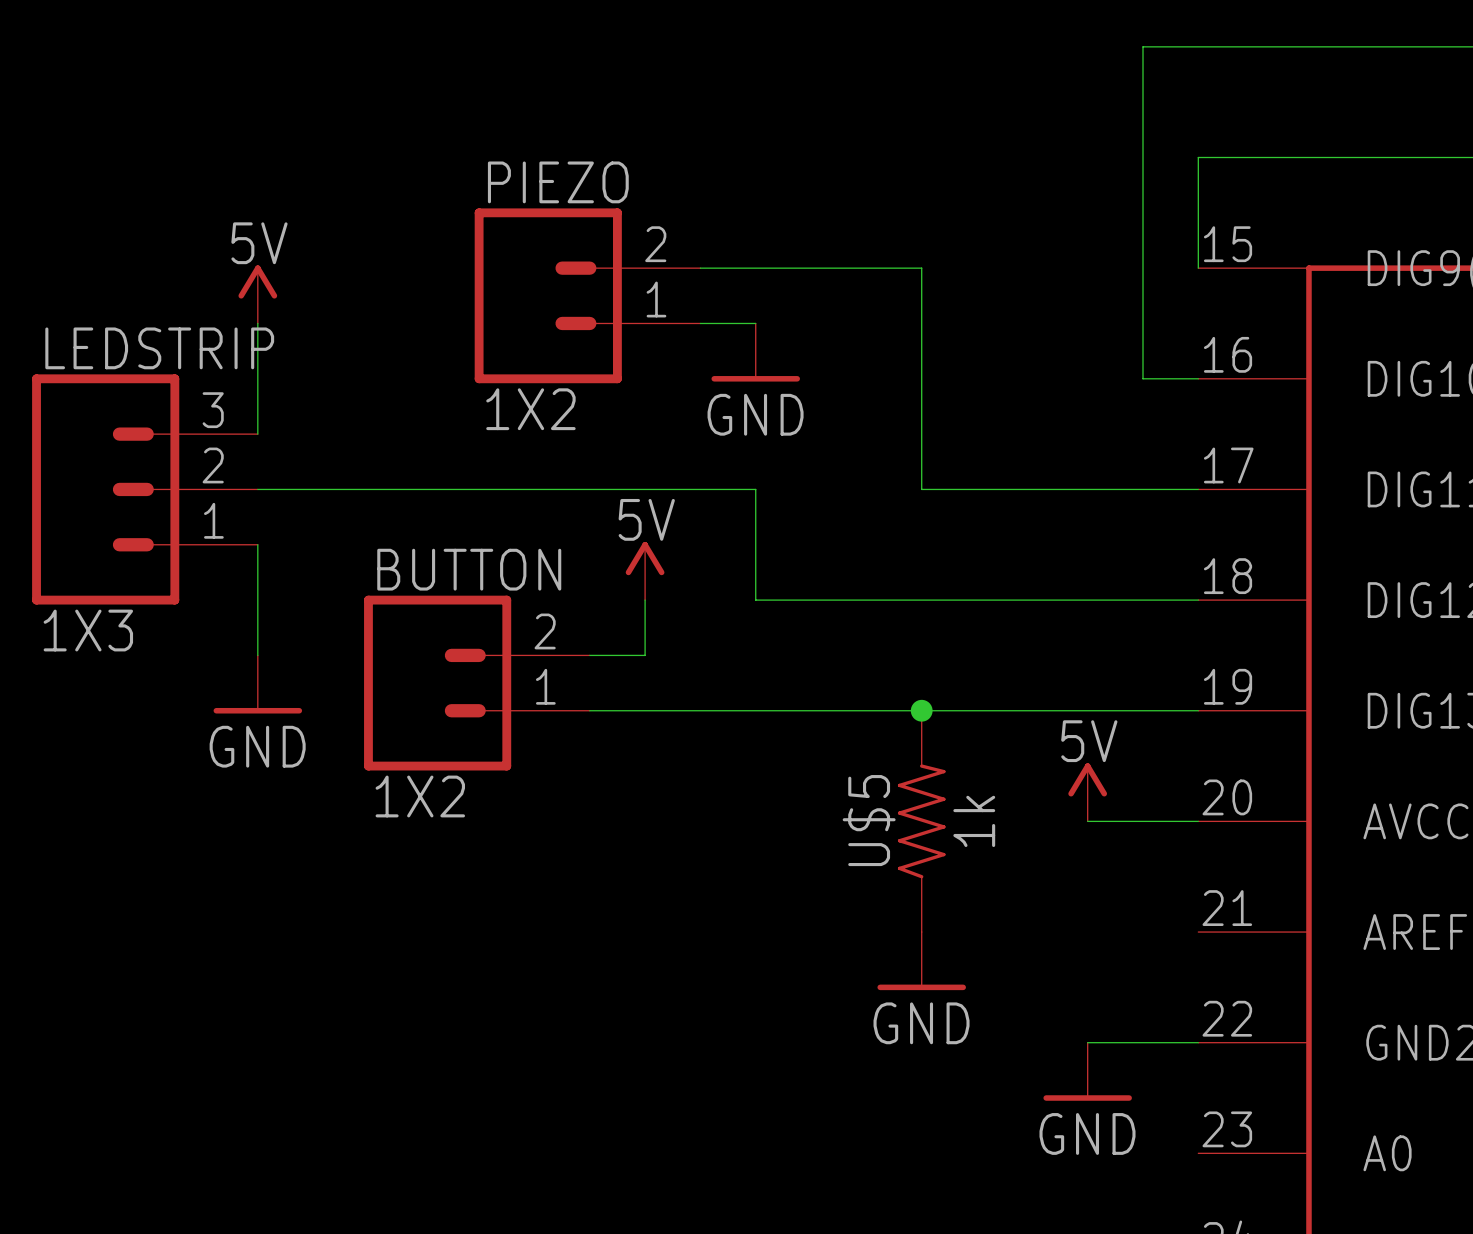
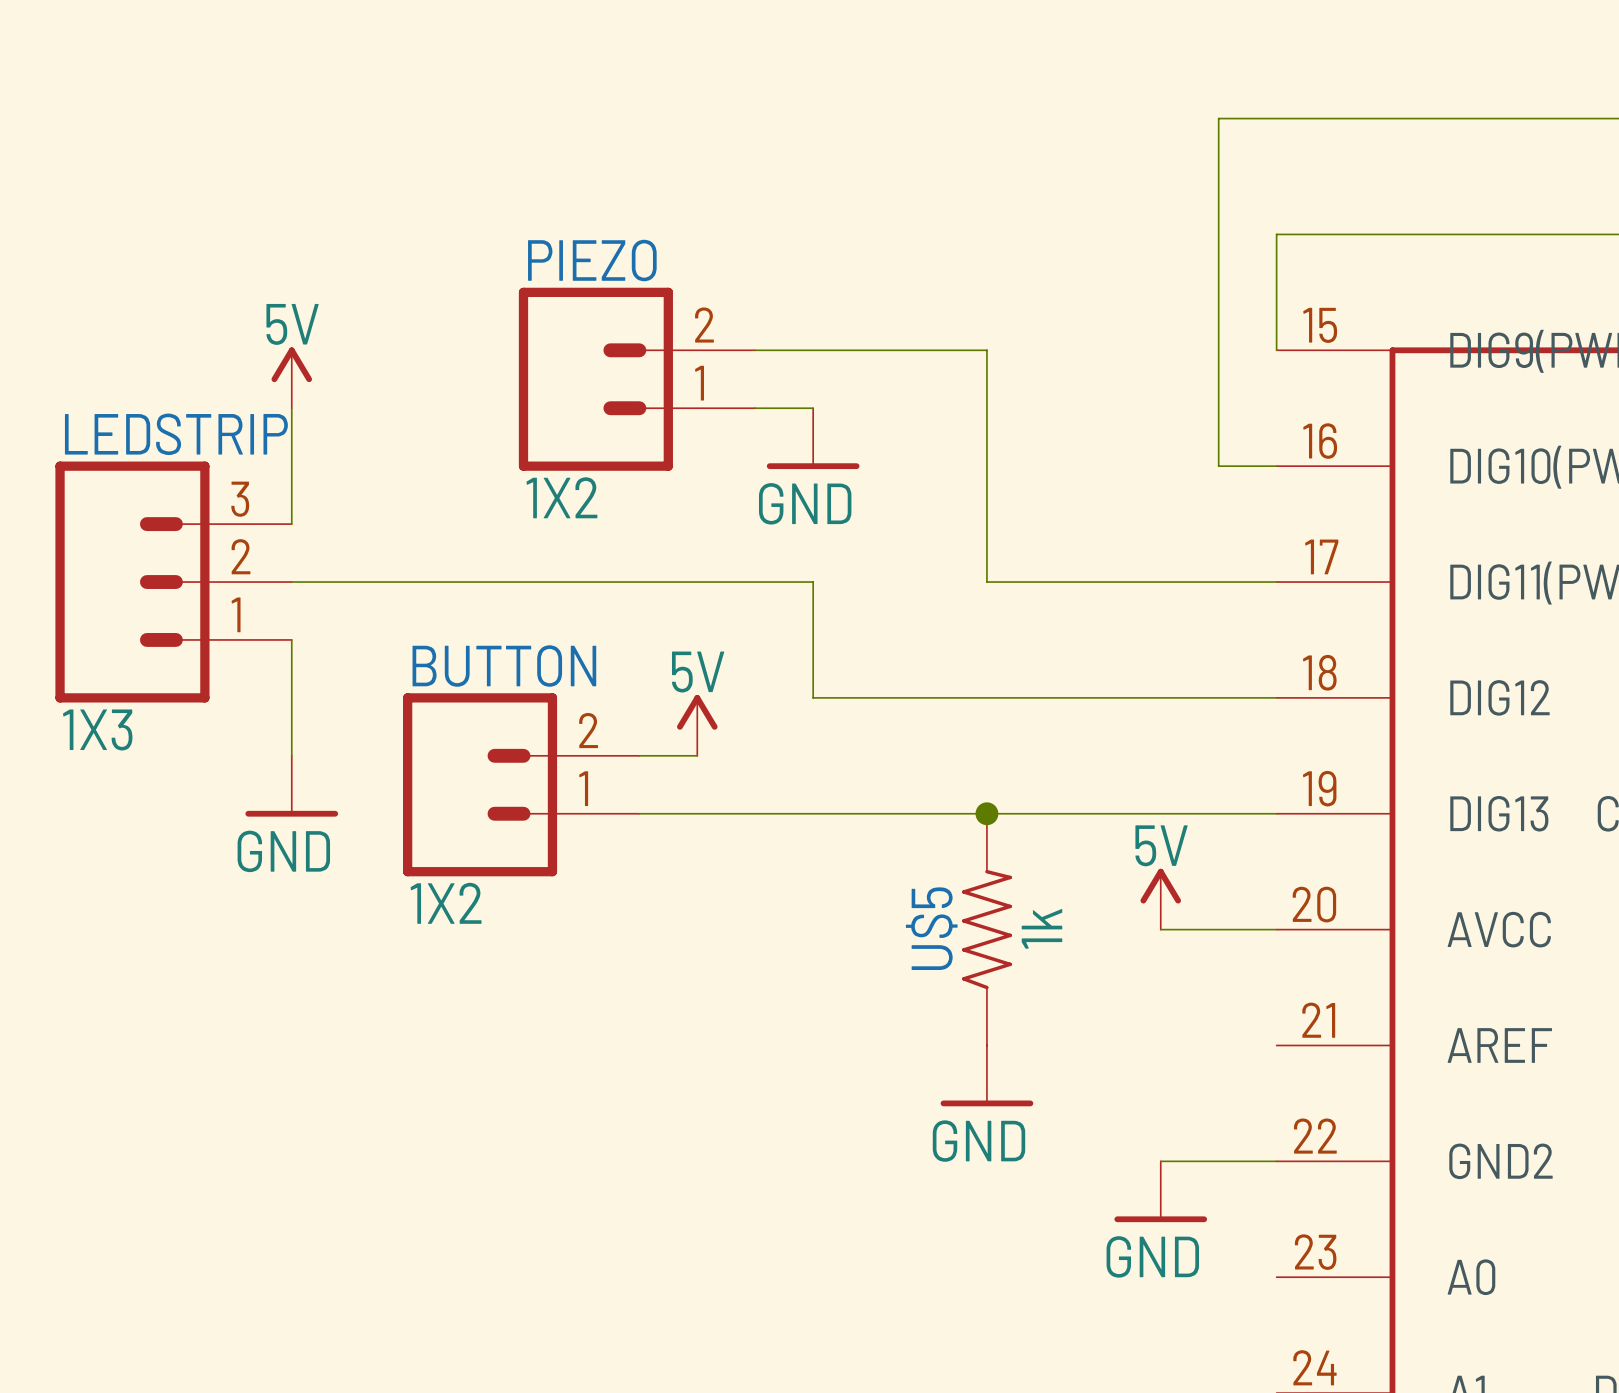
power symbol position: 5V (645, 571) -> 5V (697, 725)

